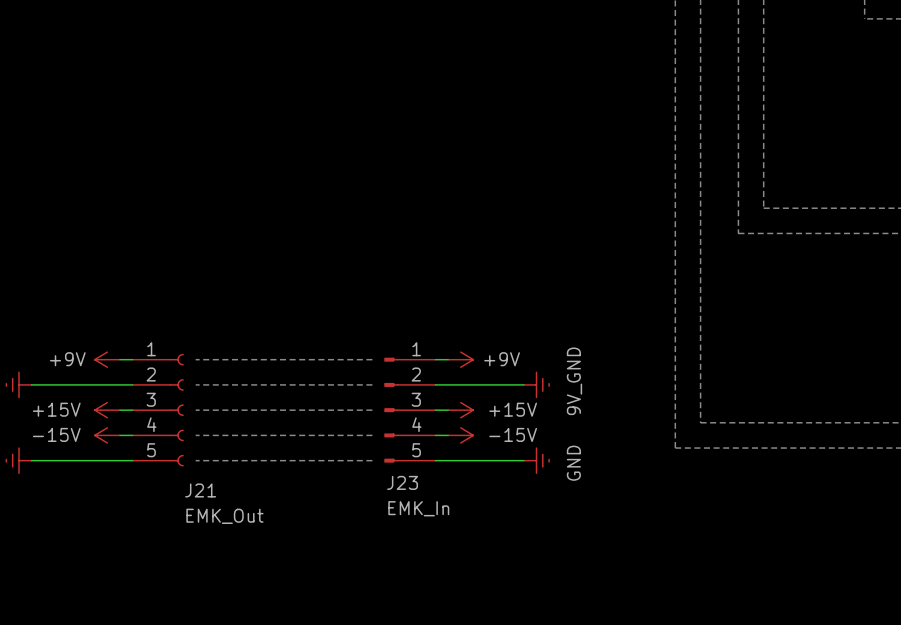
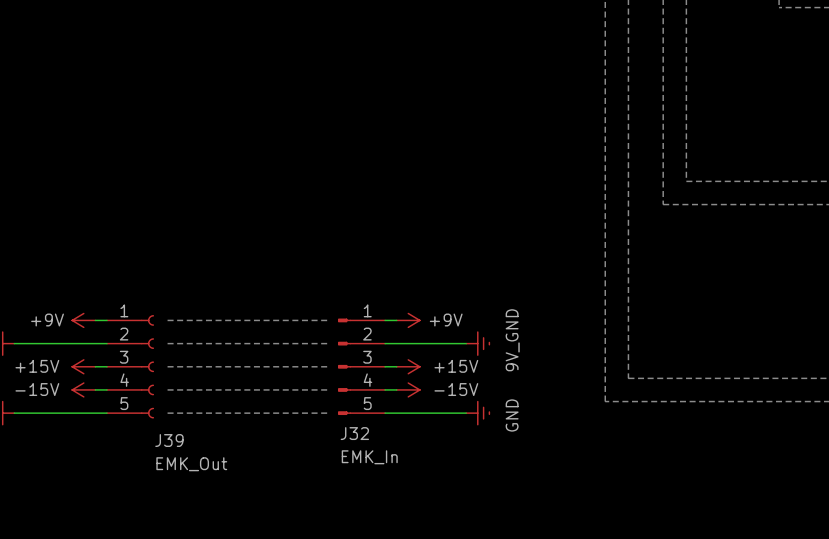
J23 name: J23 (402, 482) -> J32 (354, 433)
J21 name: J21 (200, 490) -> J39 (169, 440)

